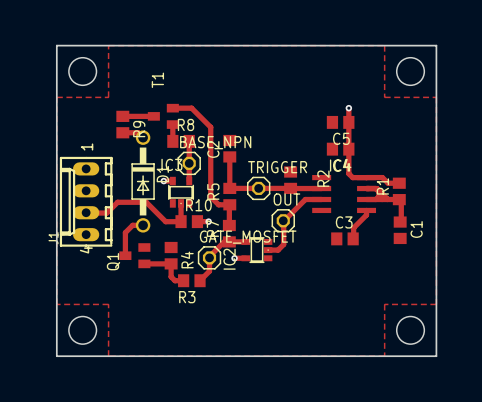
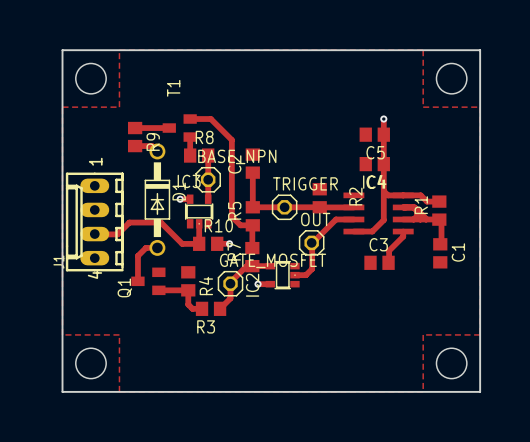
track: none -> (383, 191) (383, 220) (372, 231) (353, 231)

